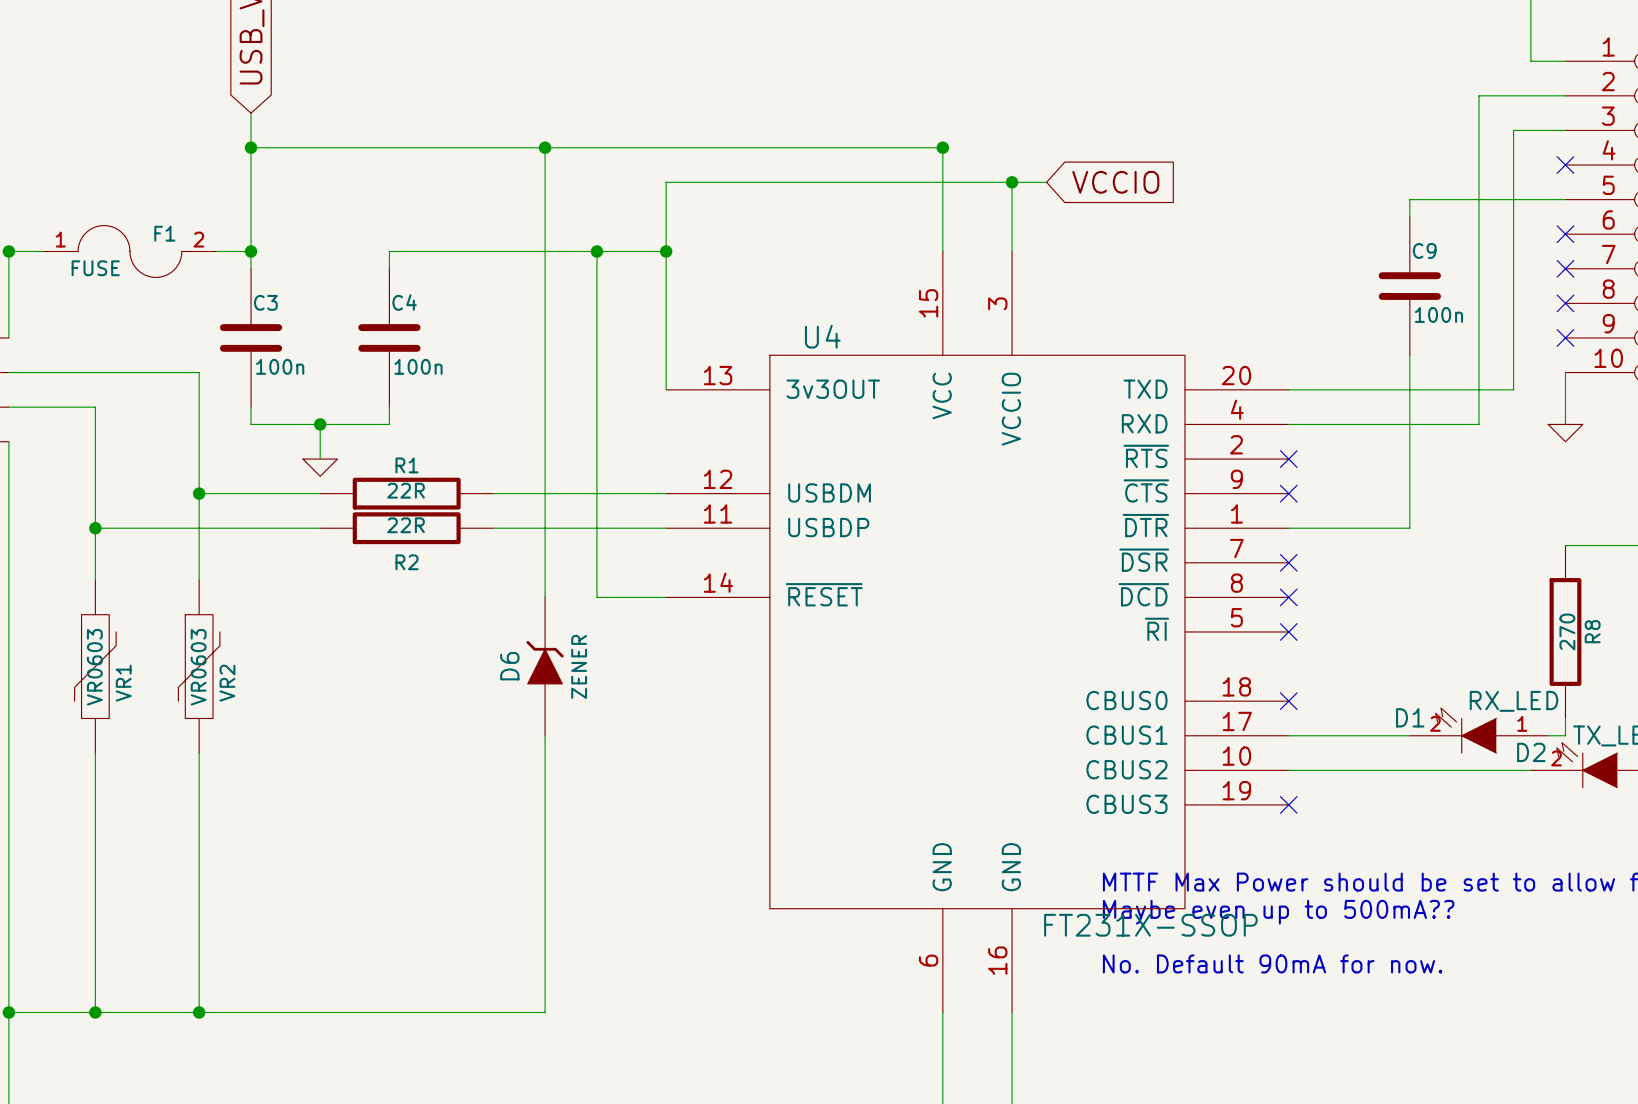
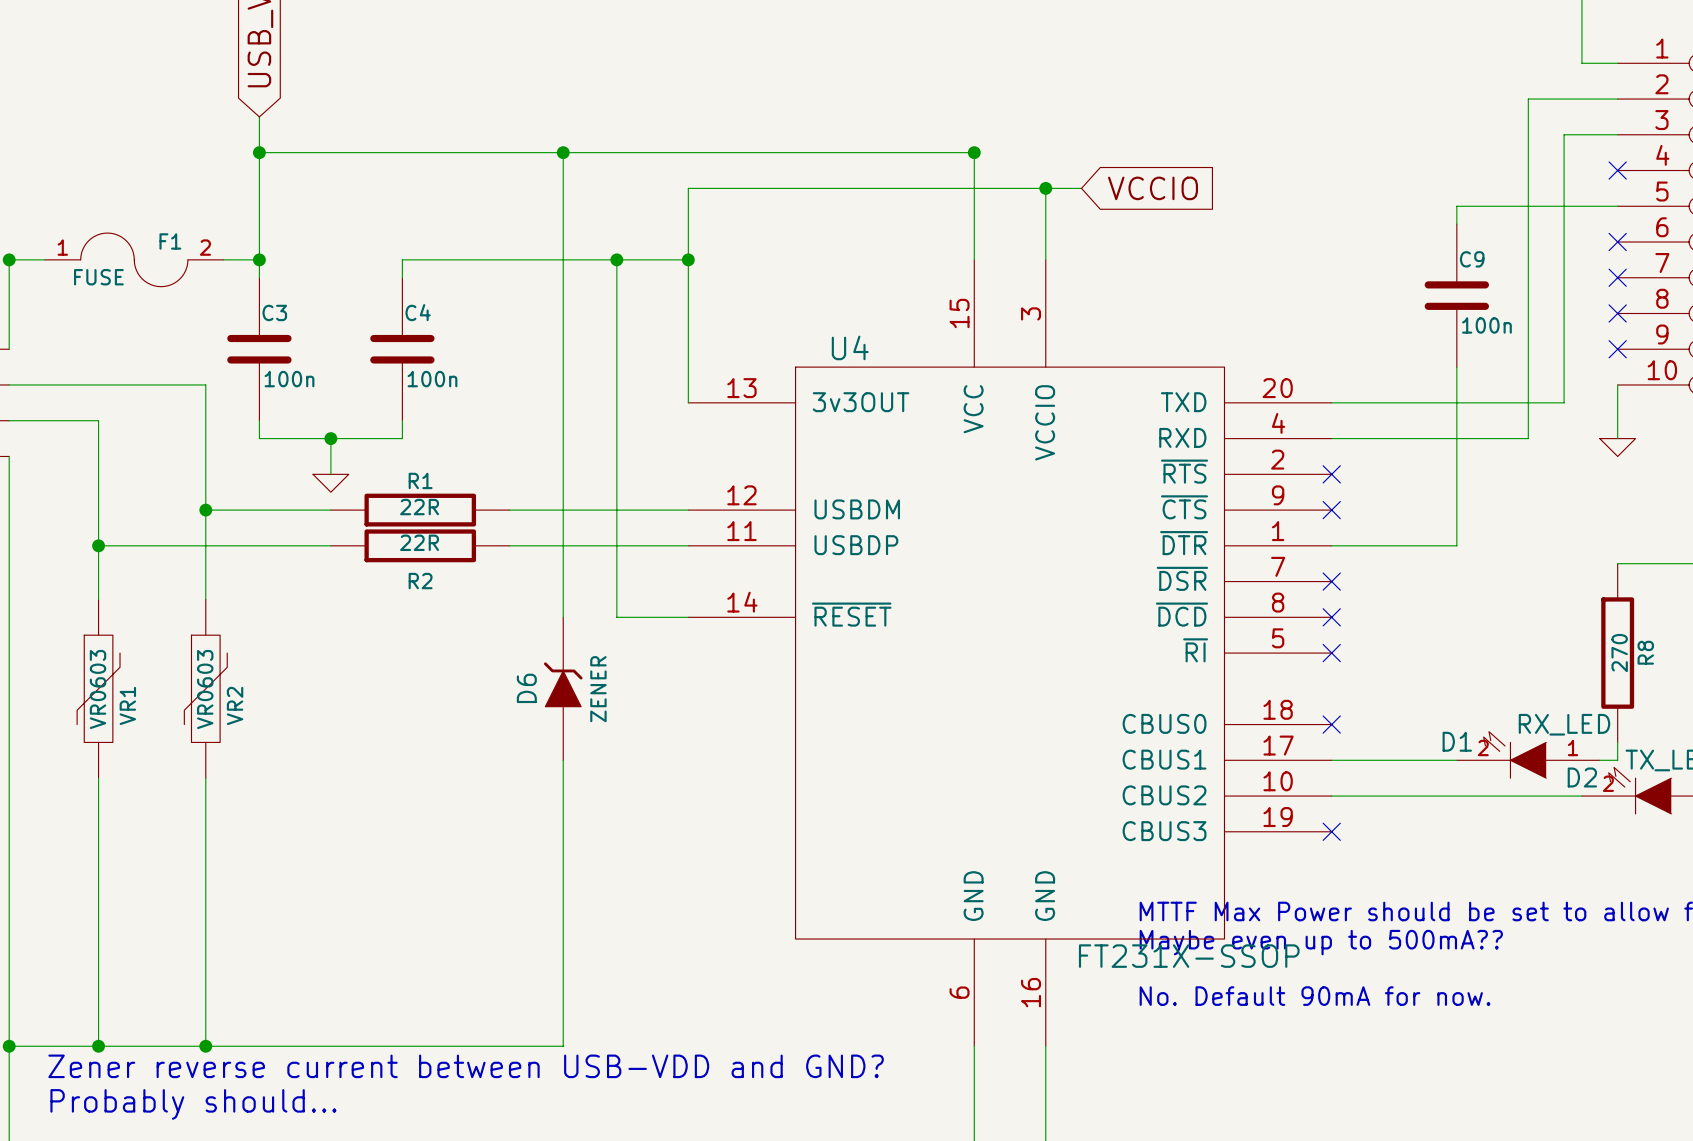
text: none -> Zener reverse current between USB-VDD and GND? (466, 1066)
text: none -> Probably should... (193, 1104)

